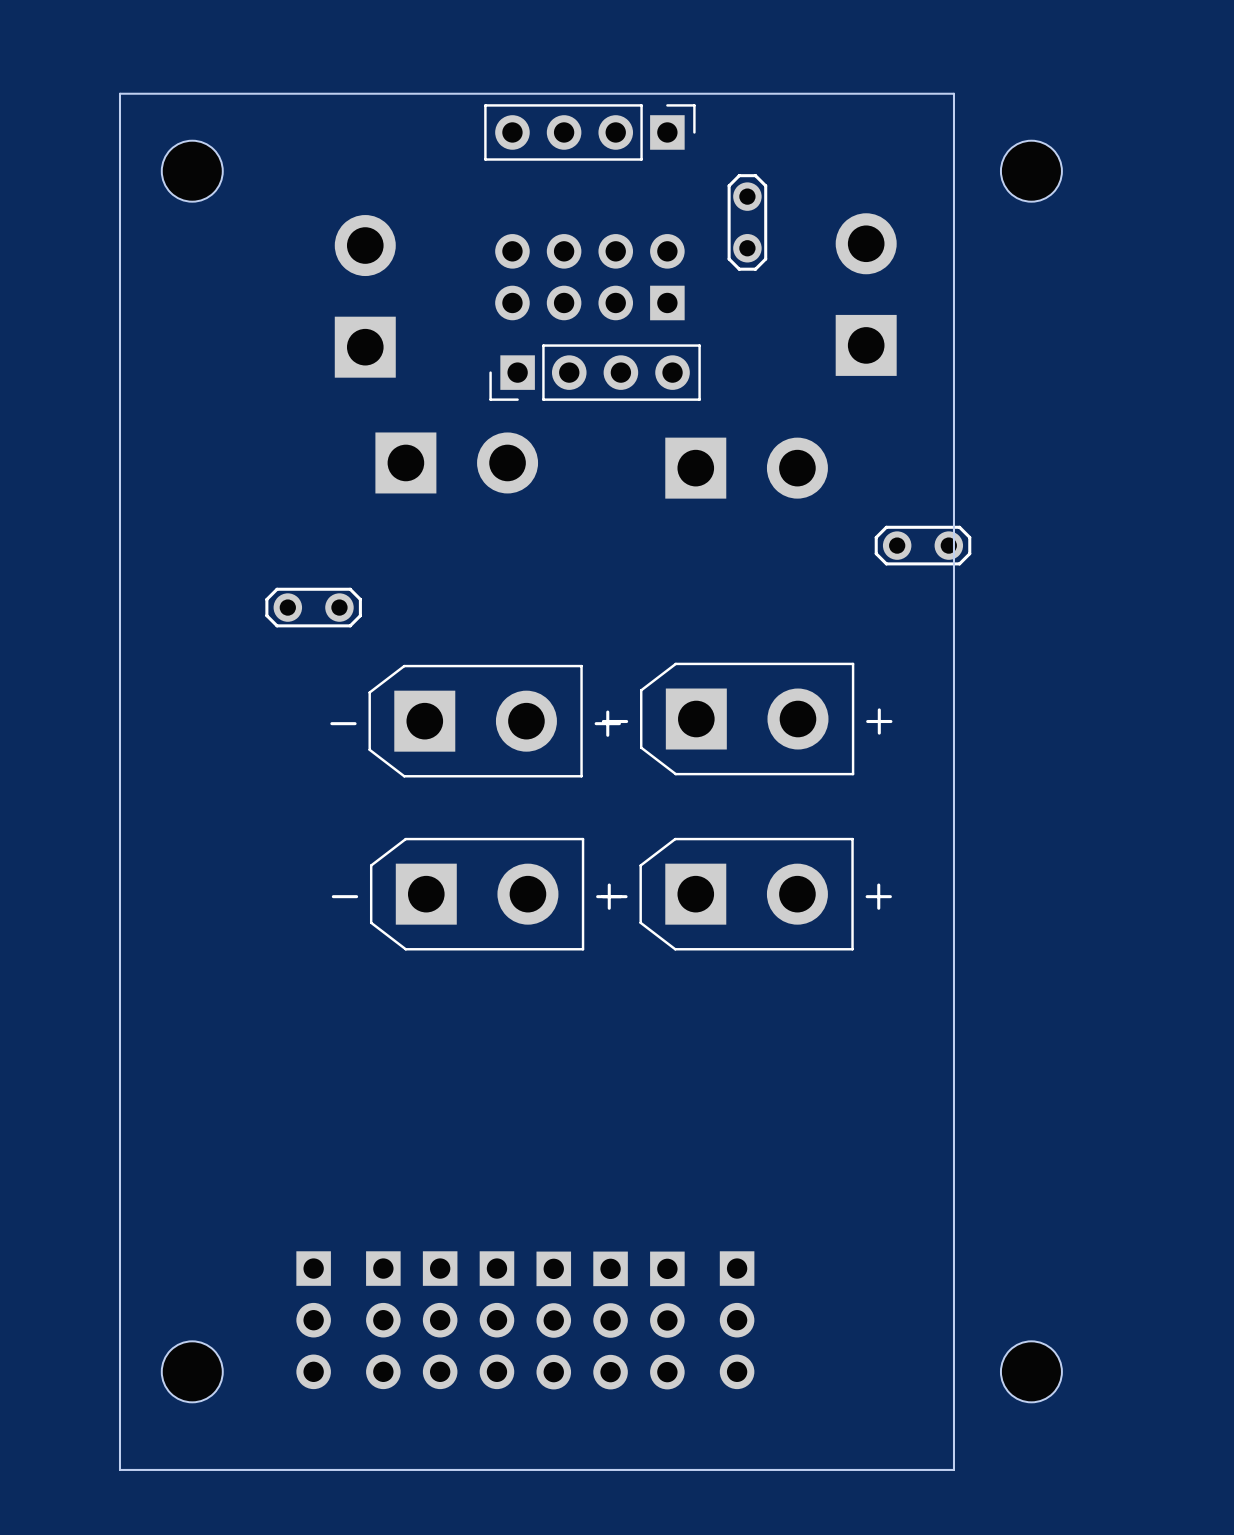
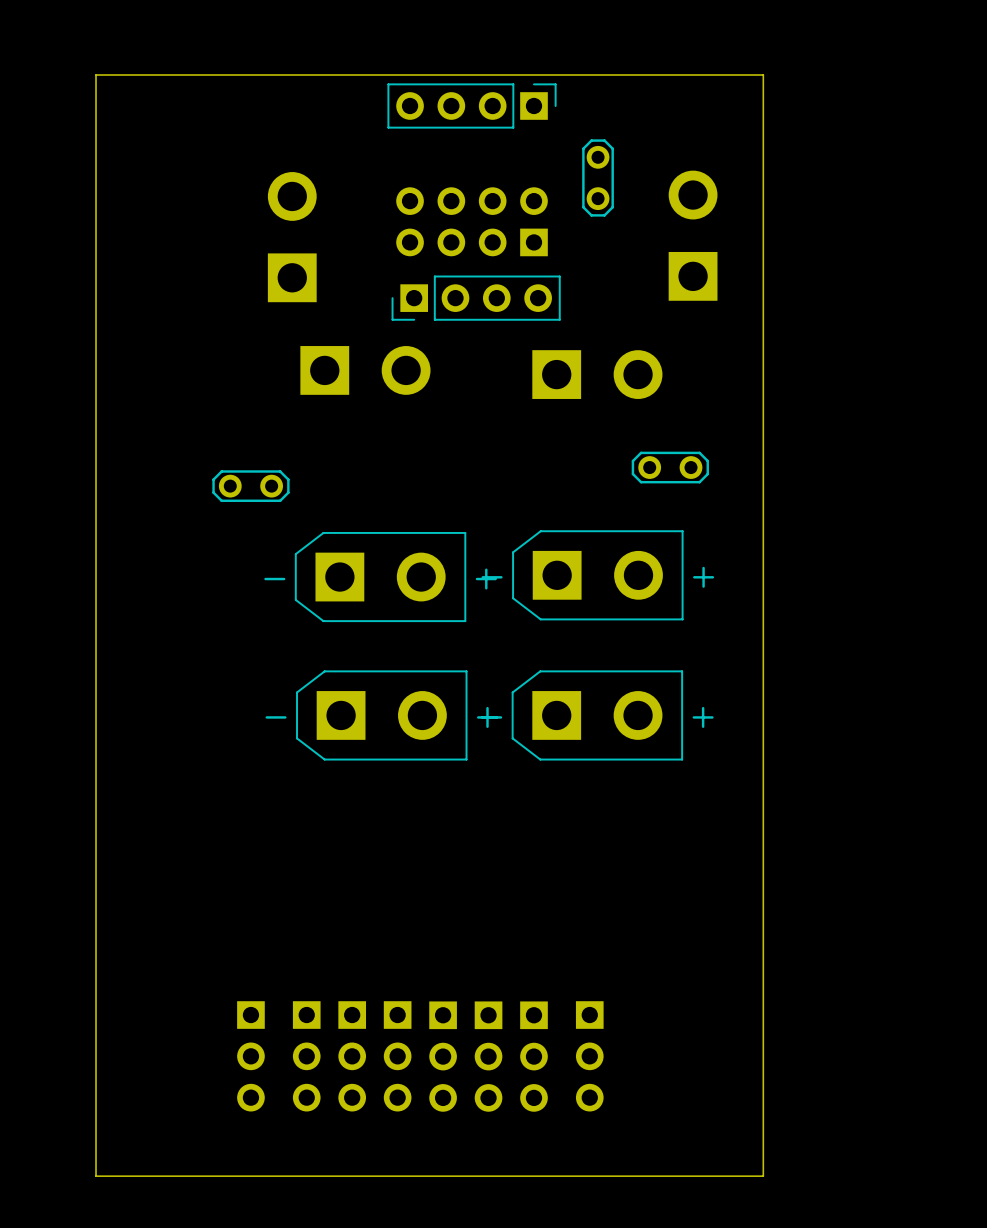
part: (192, 171) -> none
part: (1031, 171) -> none
part position: (922, 545) -> (670, 467)
part: (192, 1371) -> none
part: (1031, 1371) -> none

